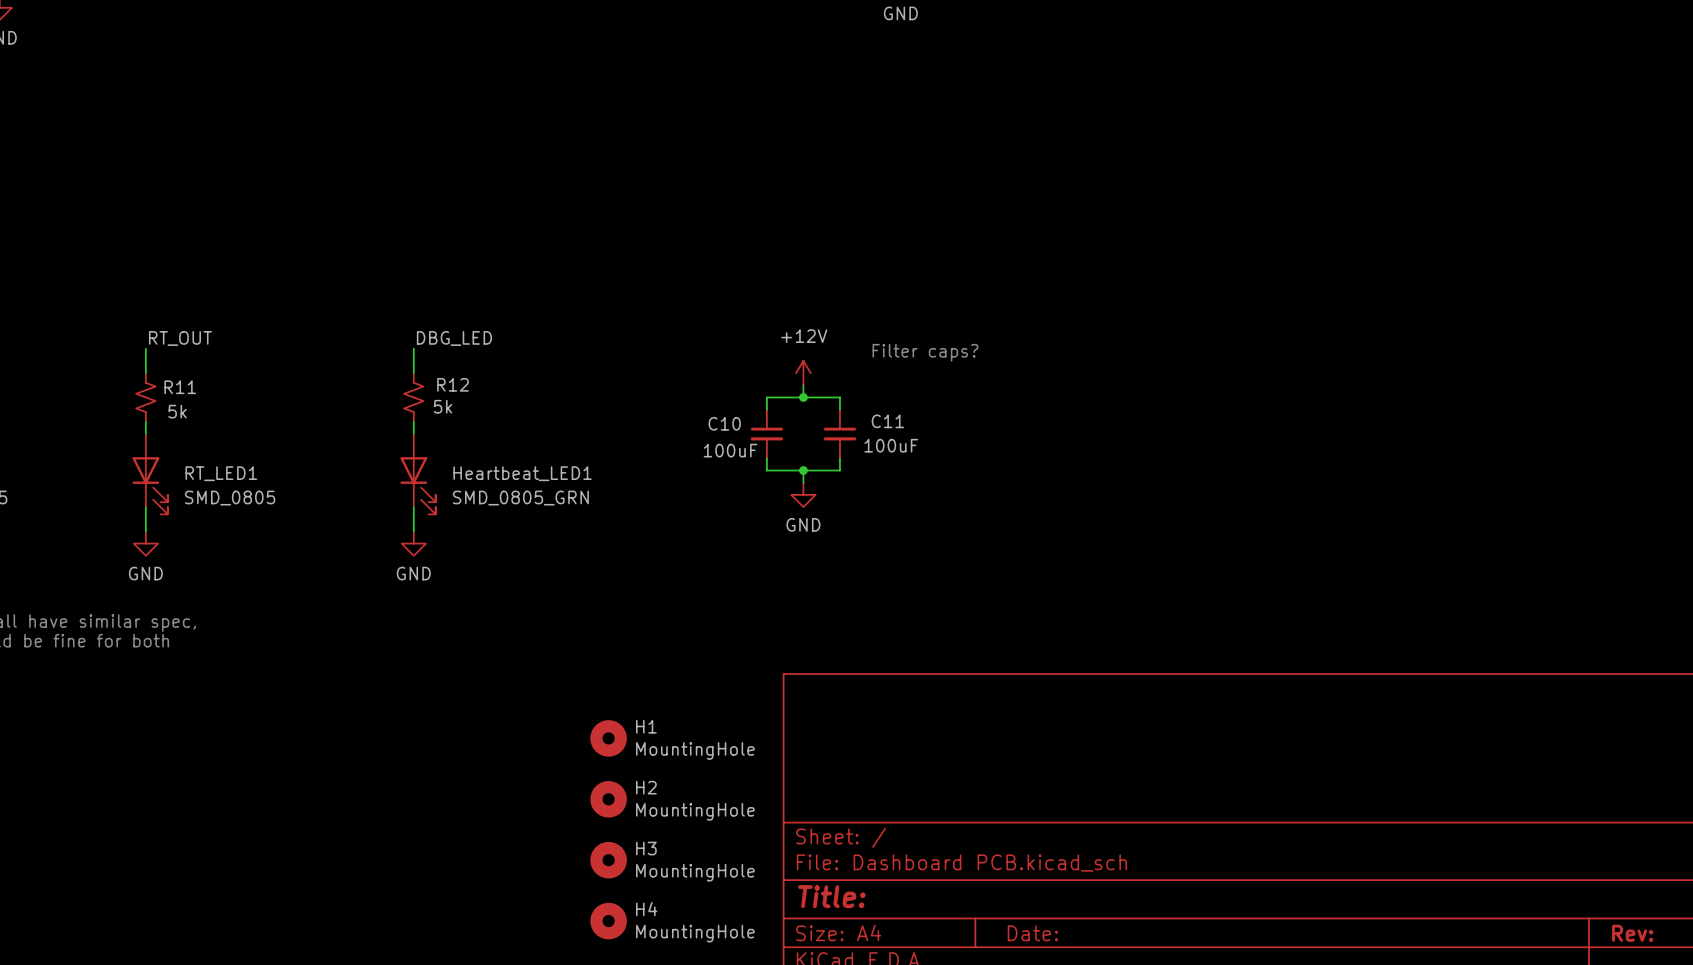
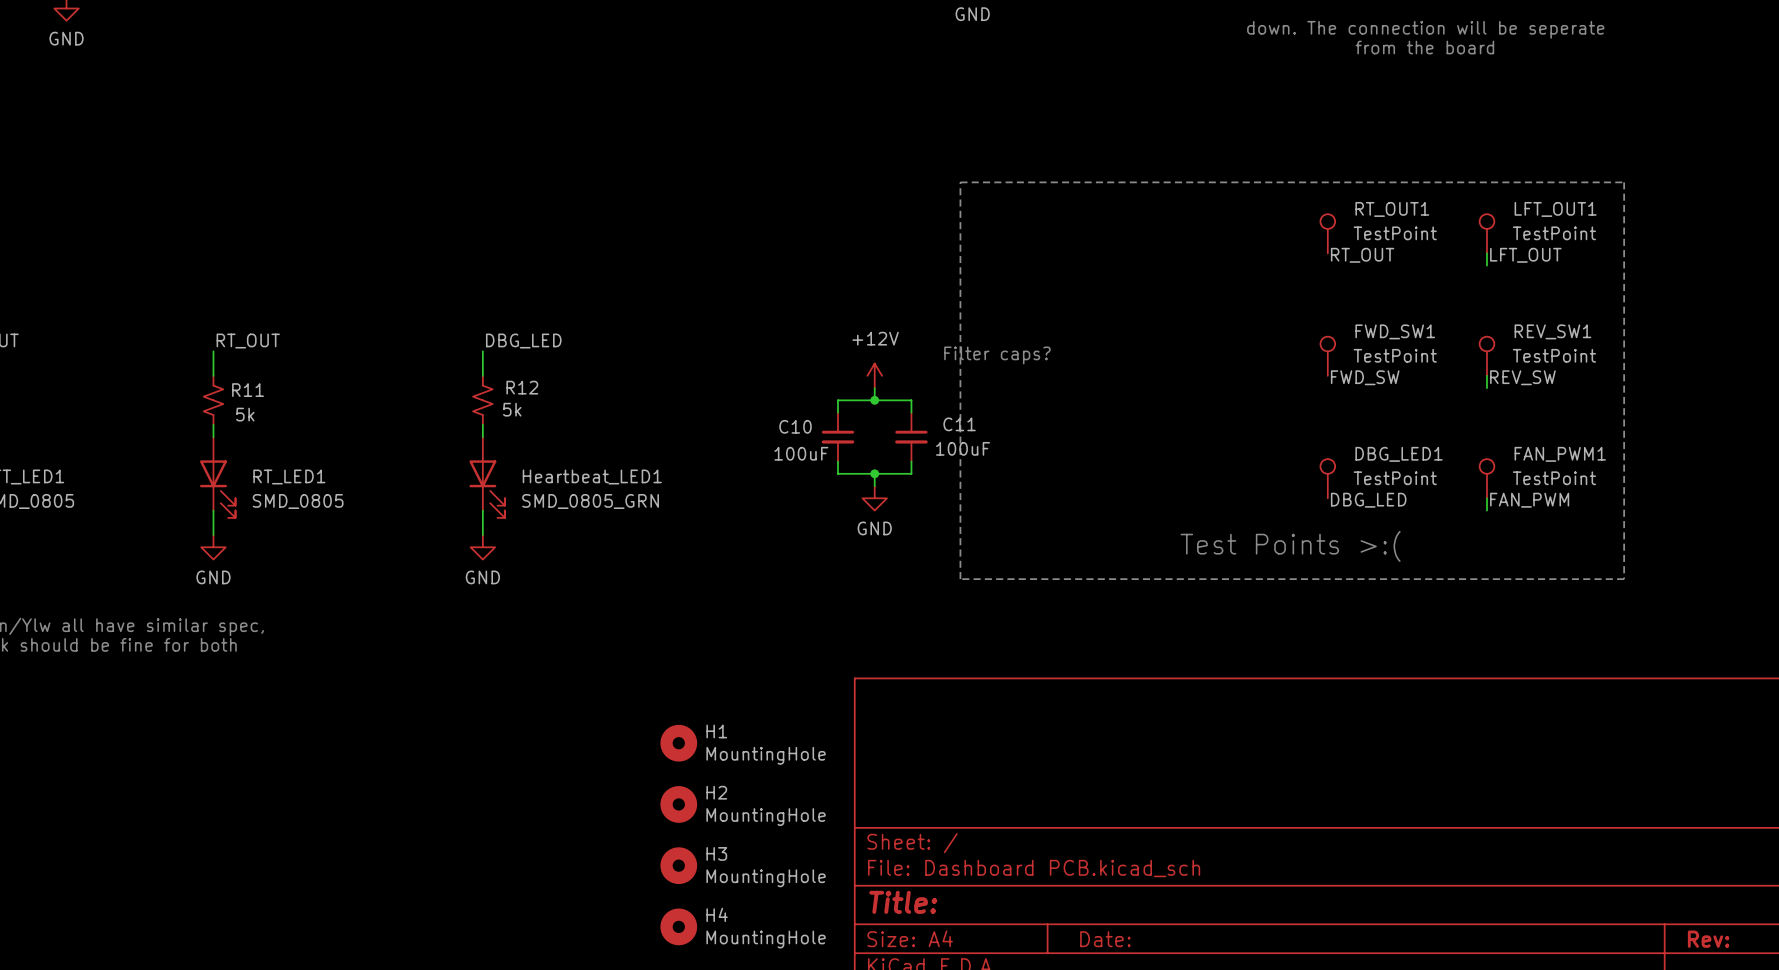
text: none -> down. The connection will be seperate (1425, 29)
text: none -> from the board (1424, 47)
line: none -> (960, 182) (1624, 182) (1624, 579) (960, 579) (960, 182)
RT_OUT1: none -> TestPoint (1327, 233)
LFT_OUT1: none -> TestPoint (1486, 233)
wire: none -> (1486, 253) (1486, 265)
label: none -> RT_OUT (1362, 255)
label: none -> LFT_OUT (1525, 255)
FWD_SW1: none -> TestPoint (1327, 356)
REV_SW1: none -> TestPoint (1486, 356)
wire: none -> (1486, 375) (1486, 388)
label: none -> FWD_SW (1365, 377)
label: none -> REV_SW (1522, 377)
DBG_LED1: none -> TestPoint (1327, 478)
FAN_PWM1: none -> TestPoint (1486, 478)
wire: none -> (1486, 498) (1486, 510)
label: none -> DBG_LED (1368, 500)
label: none -> FAN_PWM (1529, 500)
text: none -> Test Points >:( (1290, 546)

